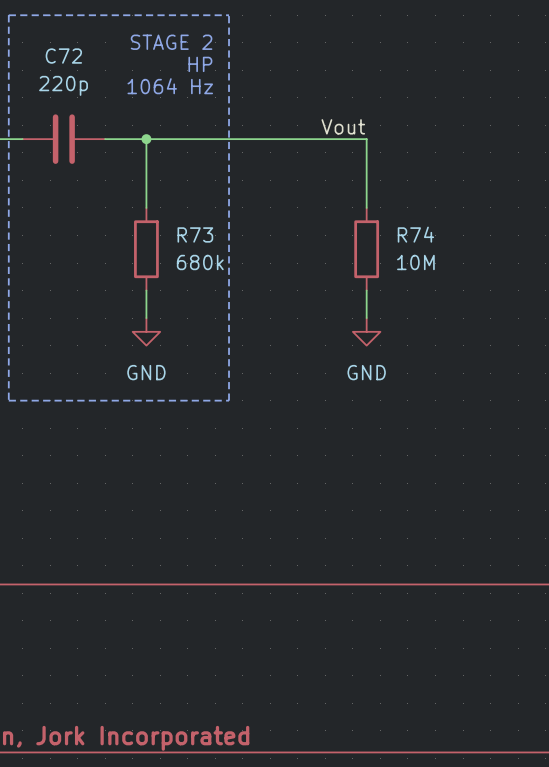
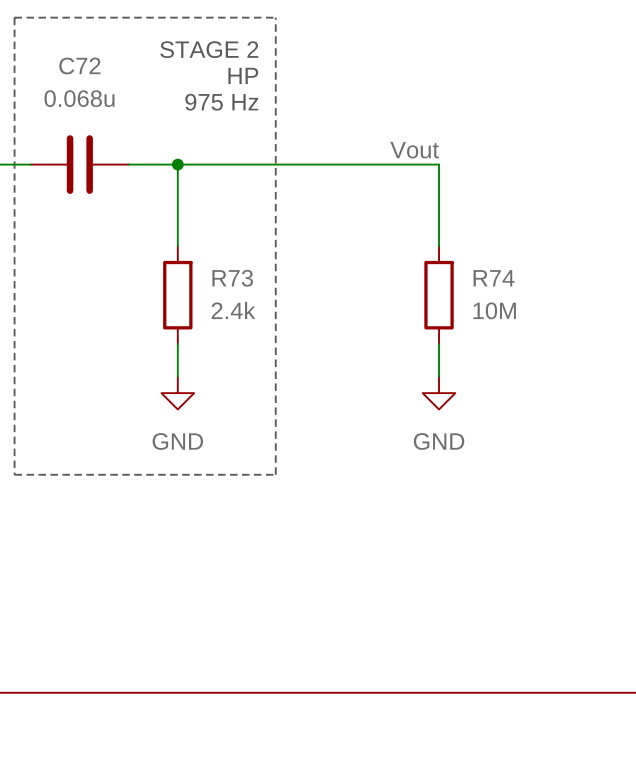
C72 value: 220p (63, 85) -> 0.068u (79, 98)
text: 1064 Hz (170, 86) -> 975 Hz (221, 102)
R73 value: 680k (200, 262) -> 2.4k (233, 310)

